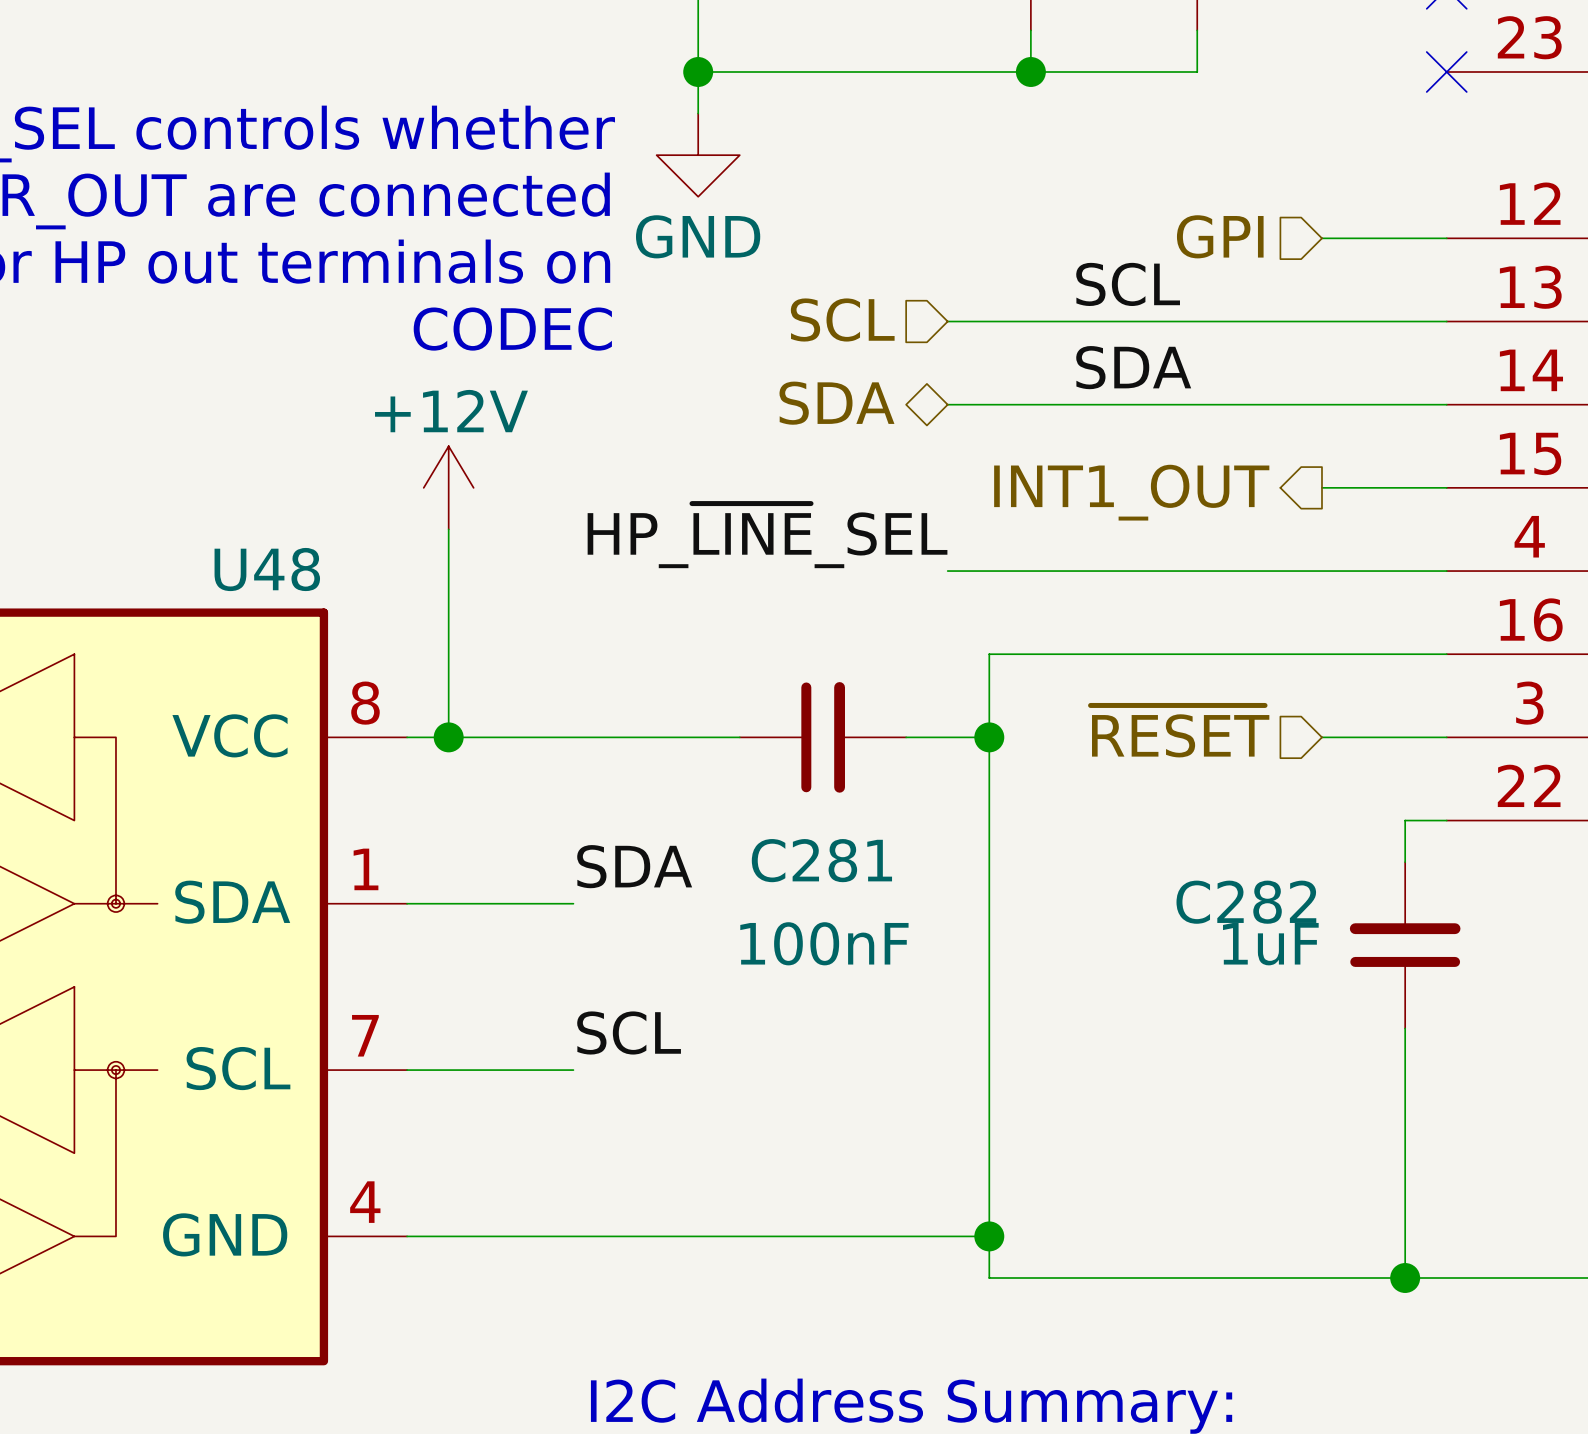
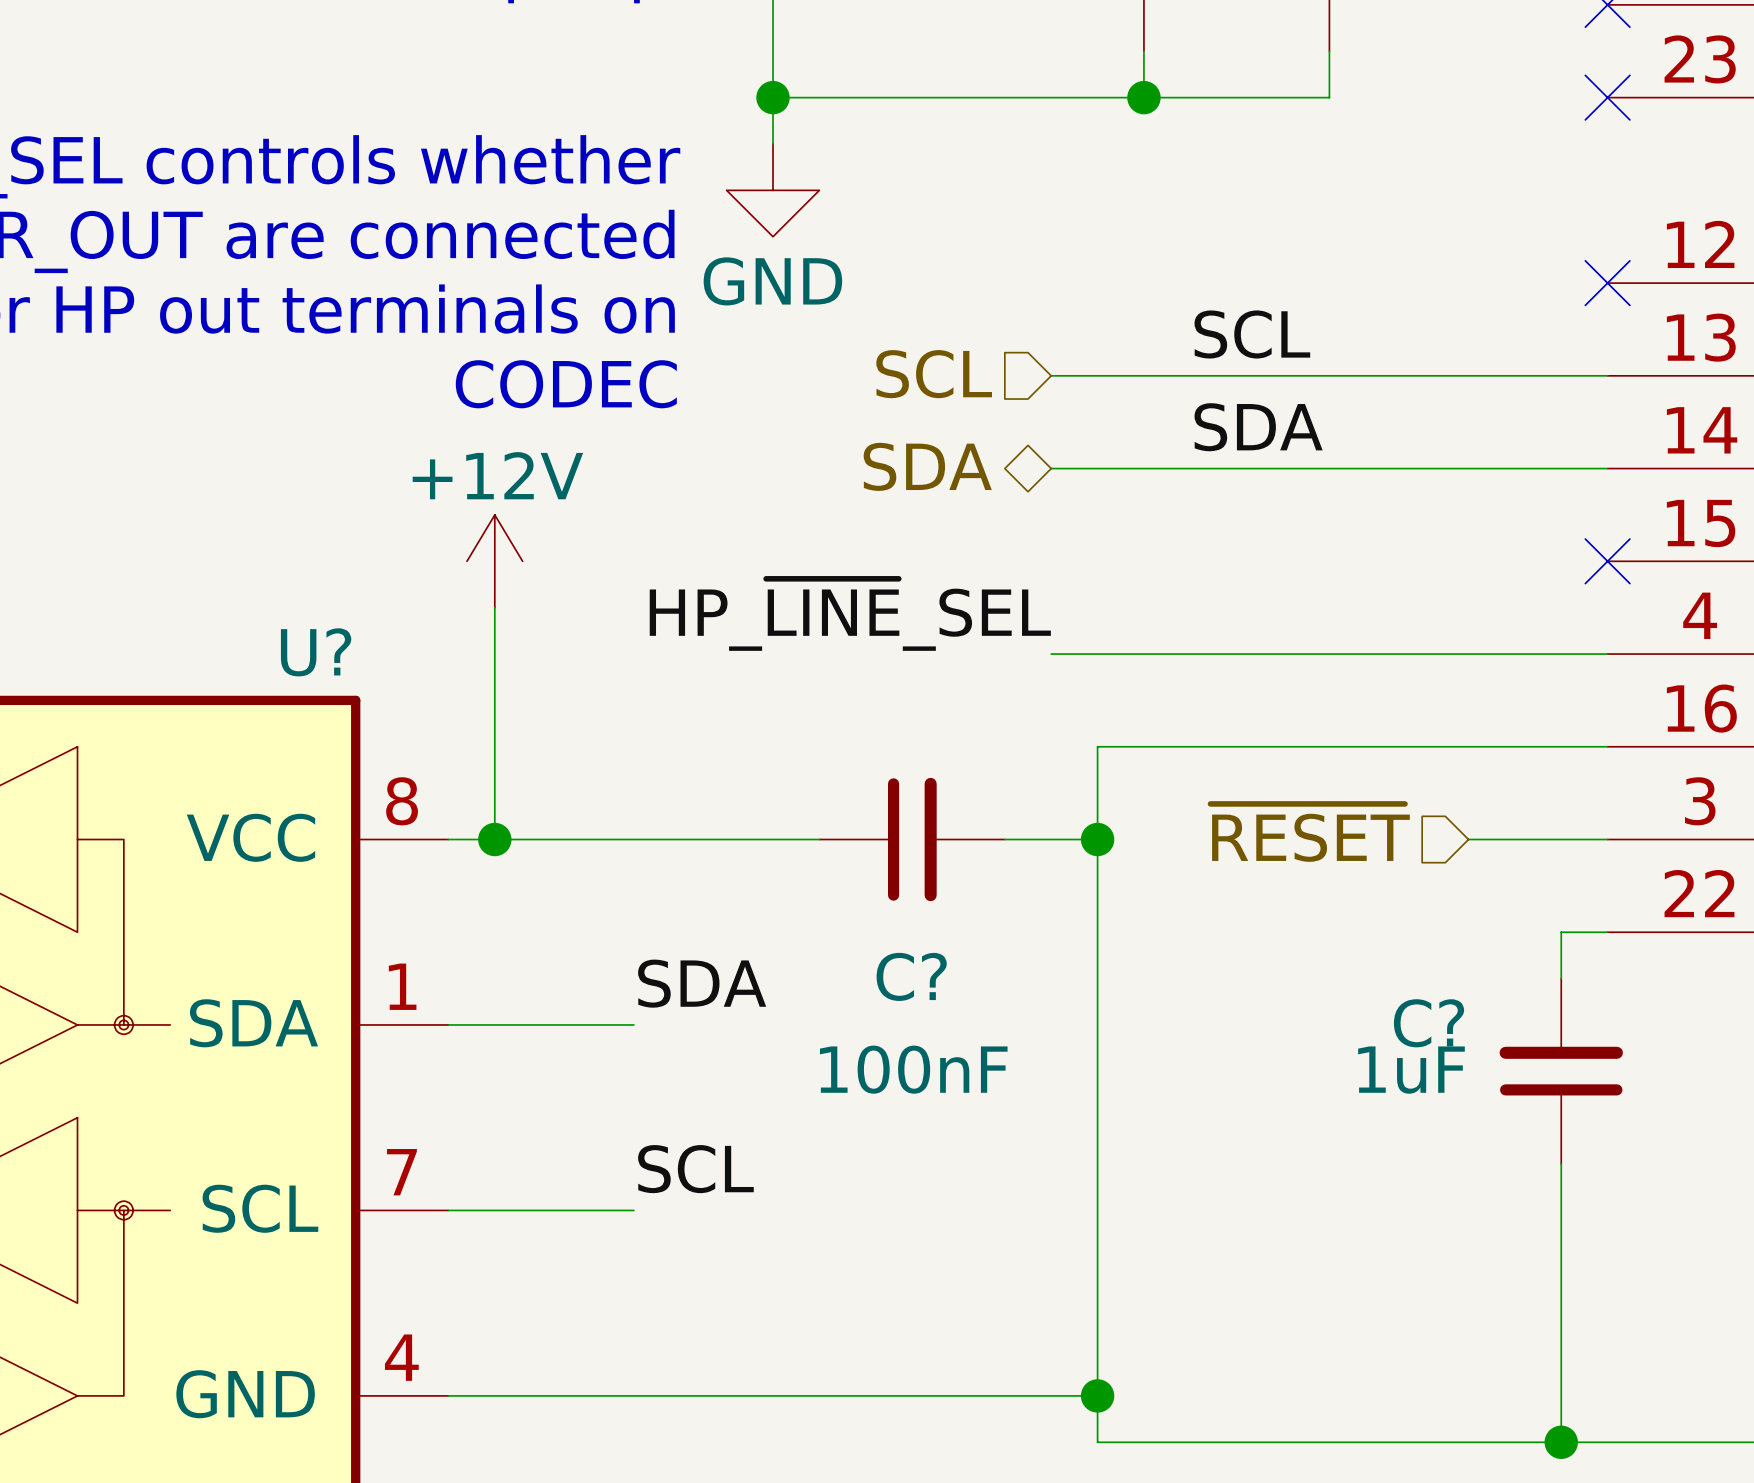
hierarchical label: GPI (1220, 236) -> none
wire: (1321, 238) (1446, 238) -> none
no-connect mark: none -> (1607, 283)
wire: (1321, 487) (1446, 487) -> none
no-connect mark: none -> (1607, 561)
hierarchical label: INT1_OUT (1131, 492) -> none
U48 name: U48 (267, 569) -> U? (316, 652)
C281 name: C281 (821, 860) -> C? (911, 976)
C282 name: C282 (1246, 902) -> C? (1429, 1023)

